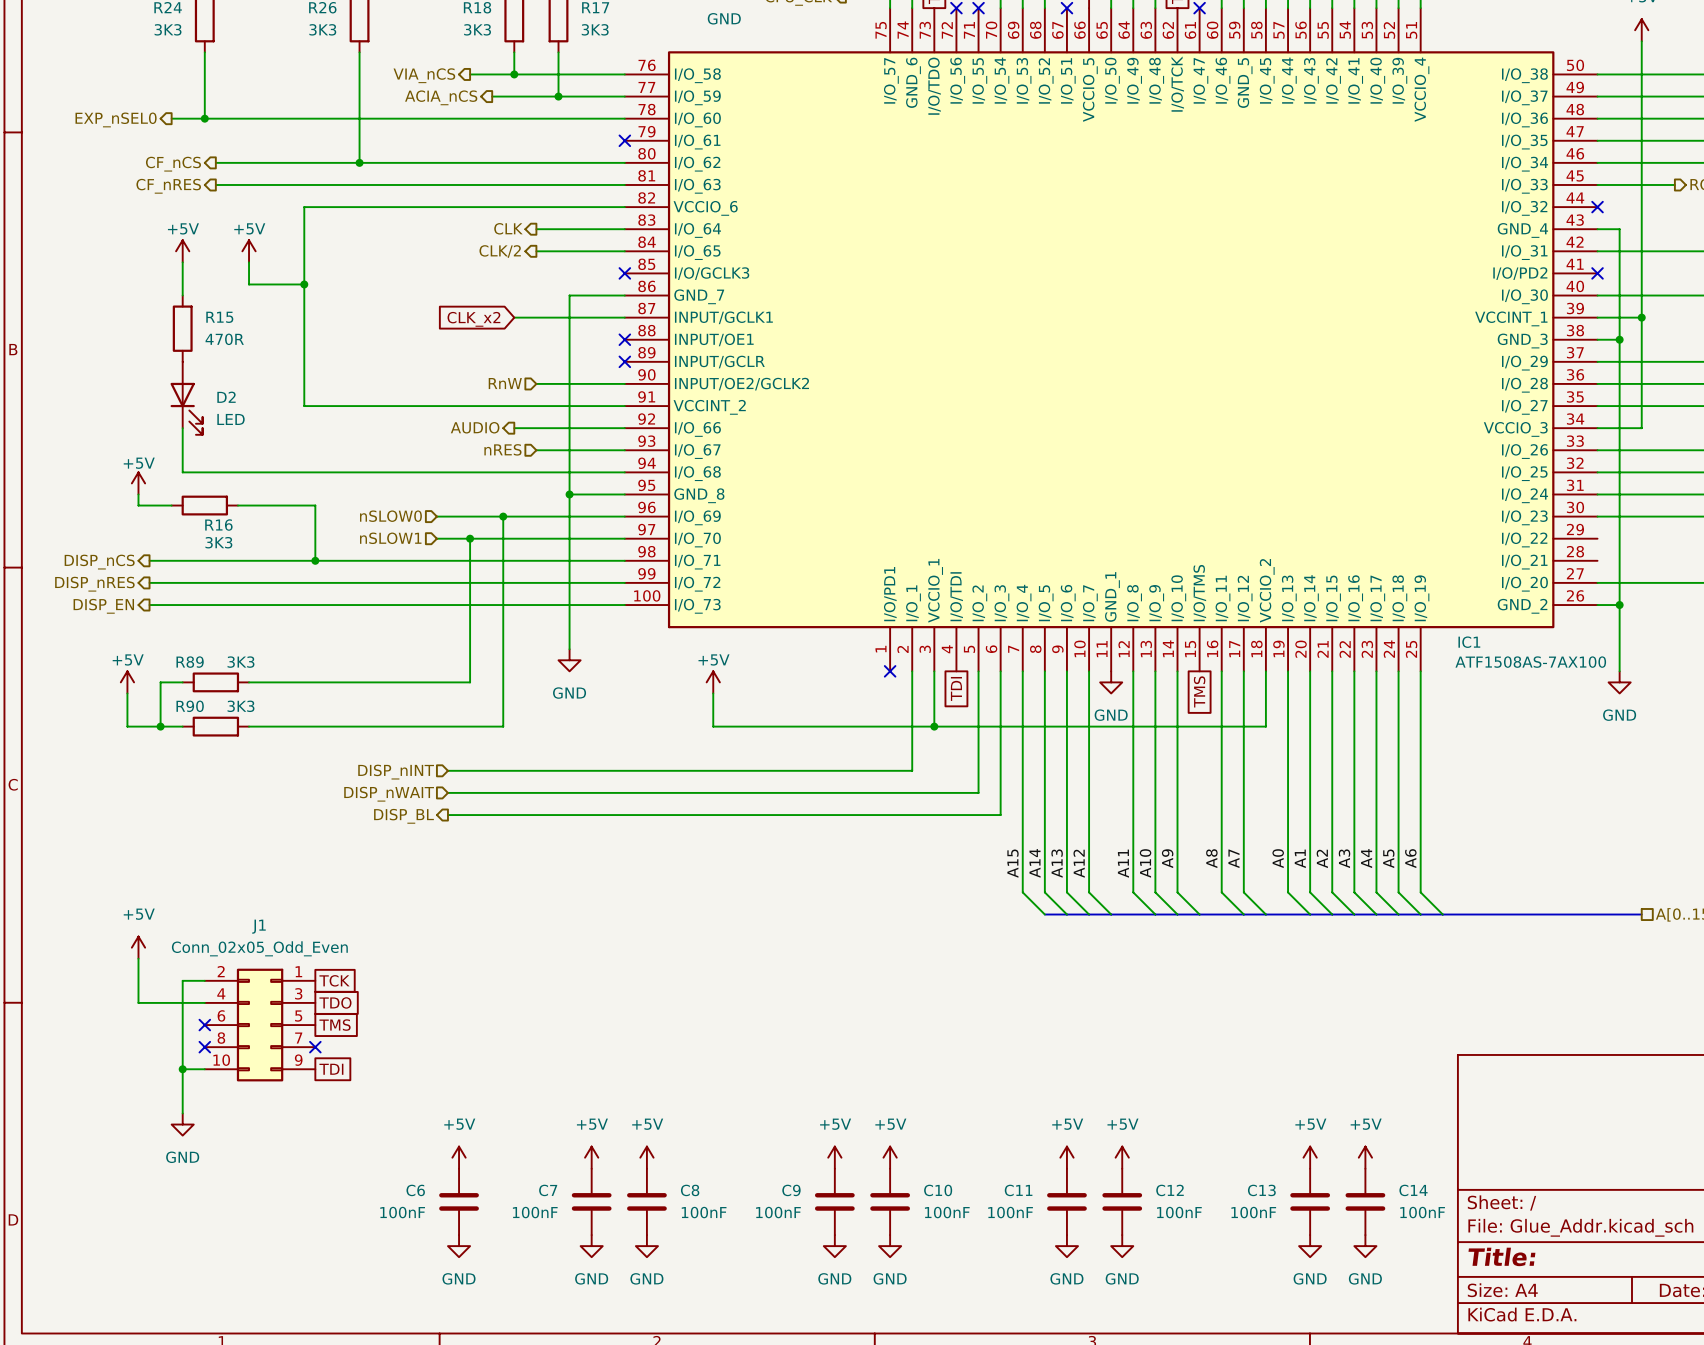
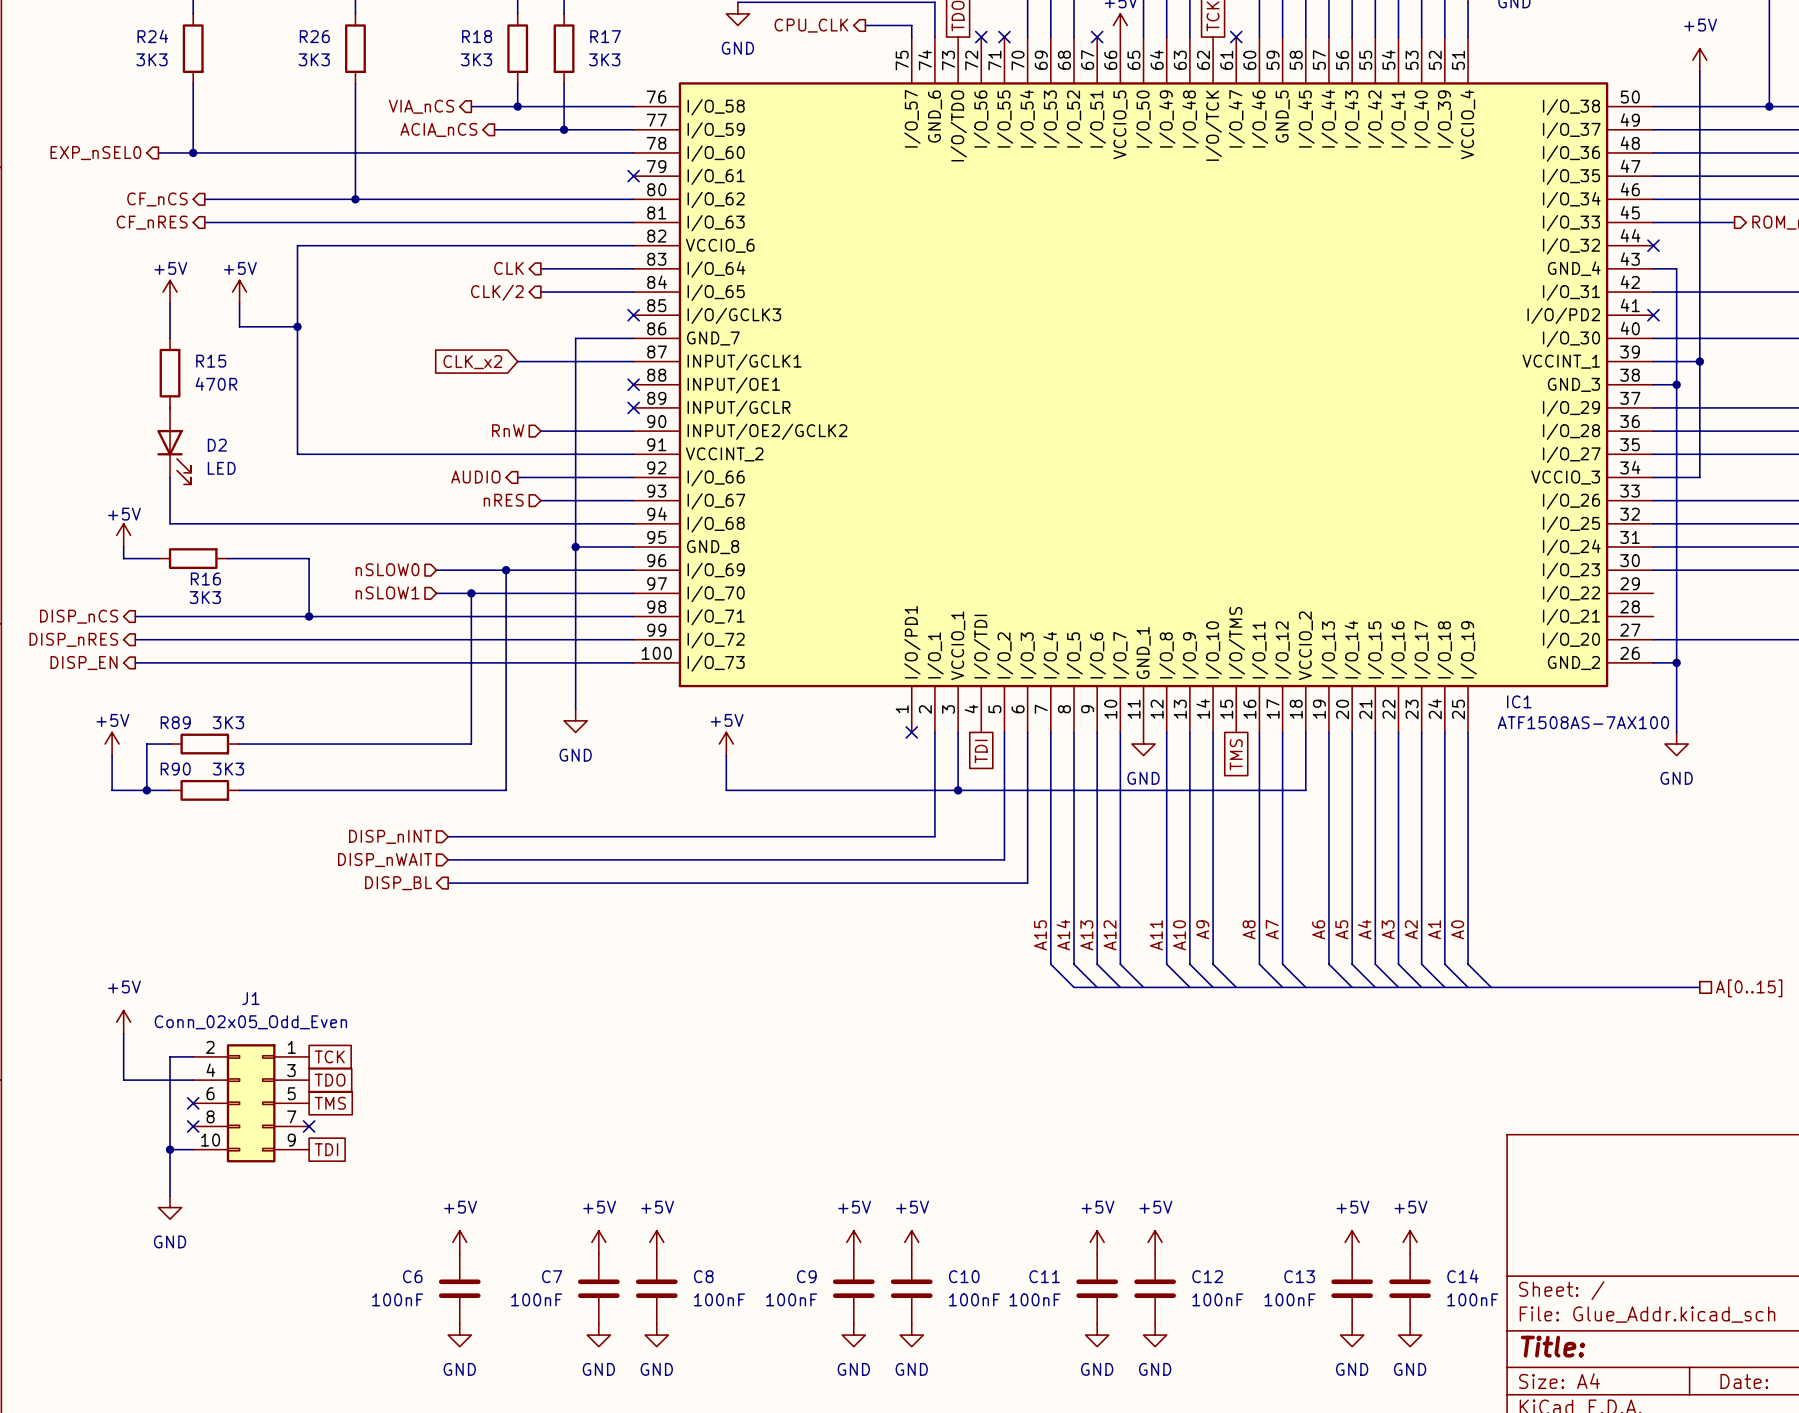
label: A0 (1278, 858) -> A6 (1318, 929)
label: A1 (1300, 858) -> A5 (1341, 929)
label: A2 (1322, 858) -> A4 (1364, 929)
label: A4 (1366, 858) -> A2 (1411, 929)
label: A5 (1388, 858) -> A1 (1434, 929)
label: A6 (1410, 858) -> A0 (1457, 929)

